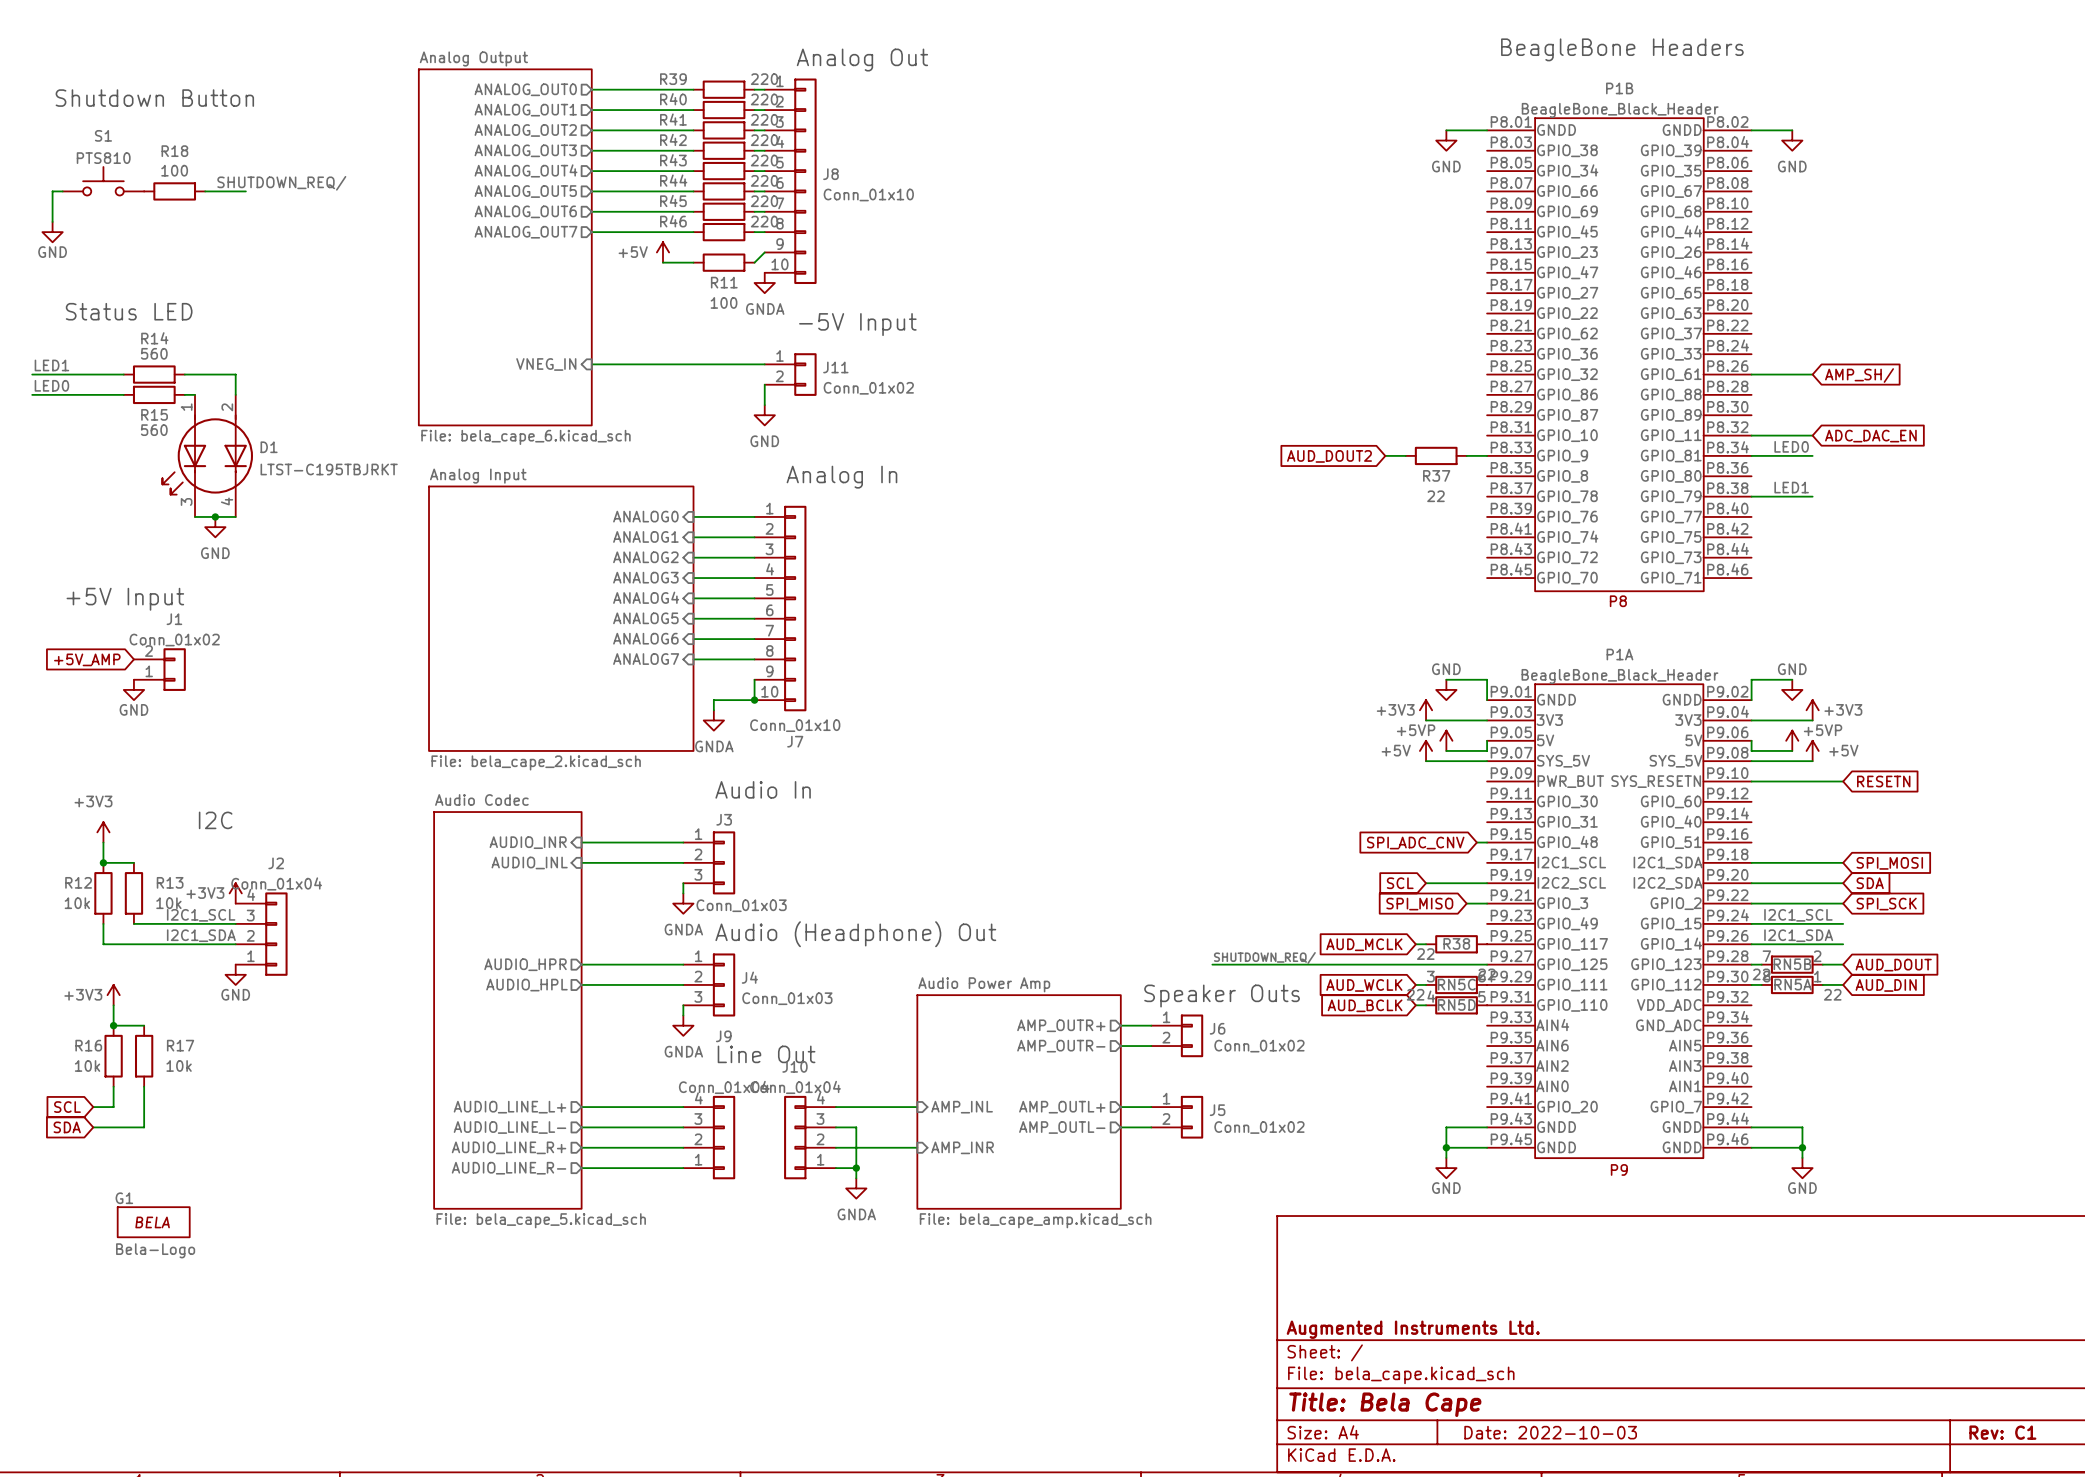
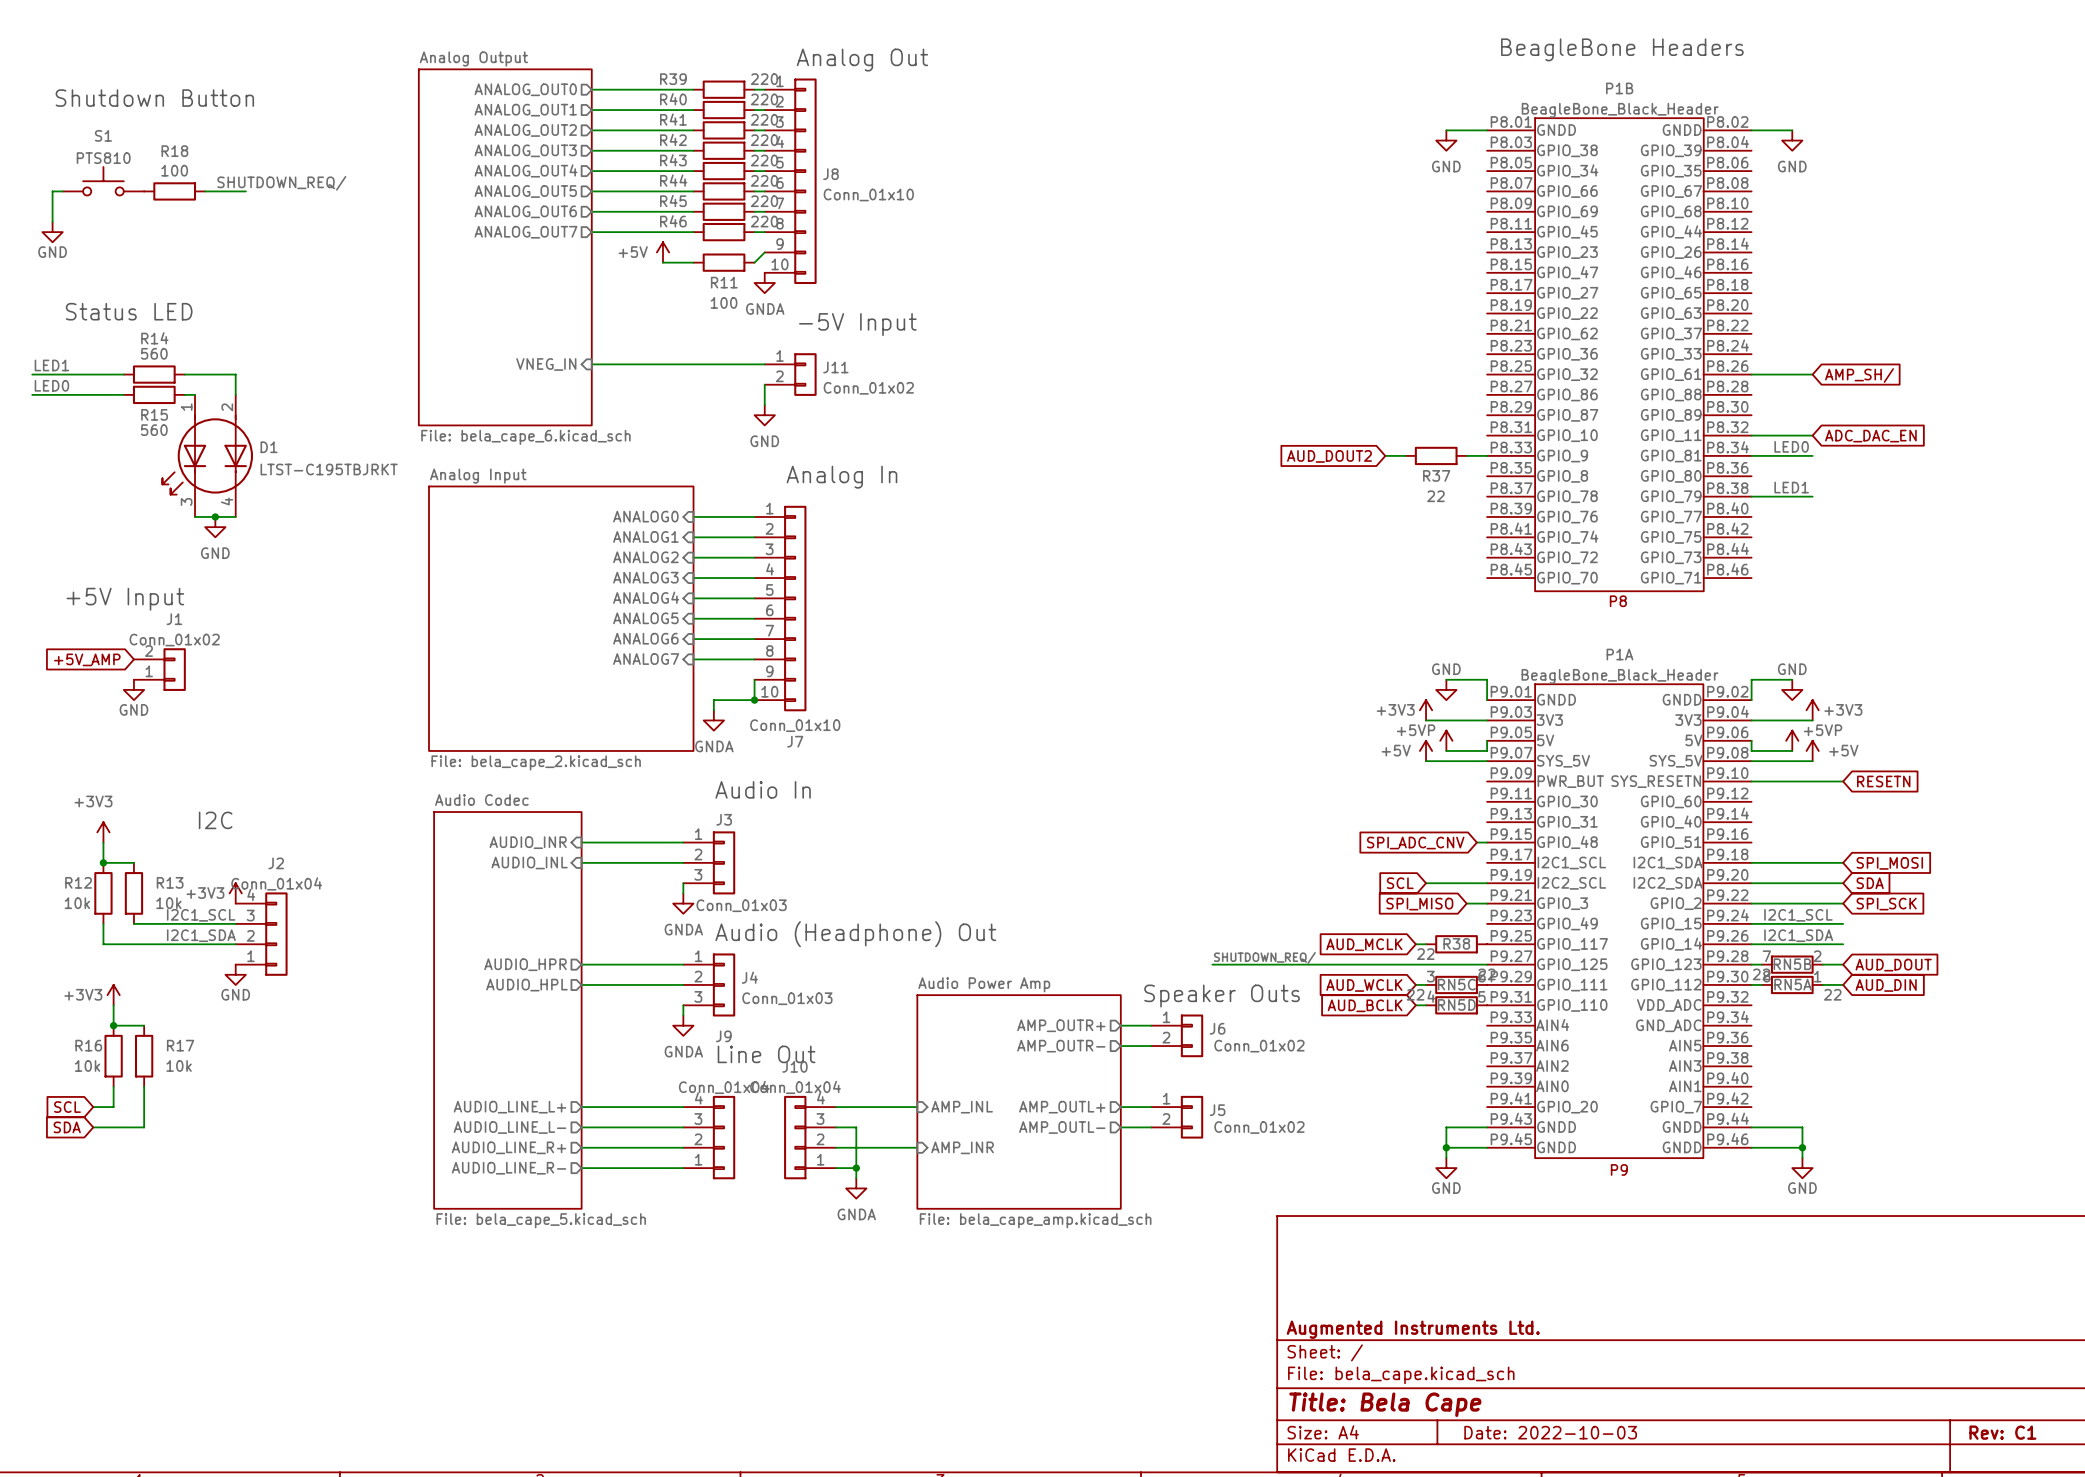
G1: Bela-Logo (153, 1222) -> none

